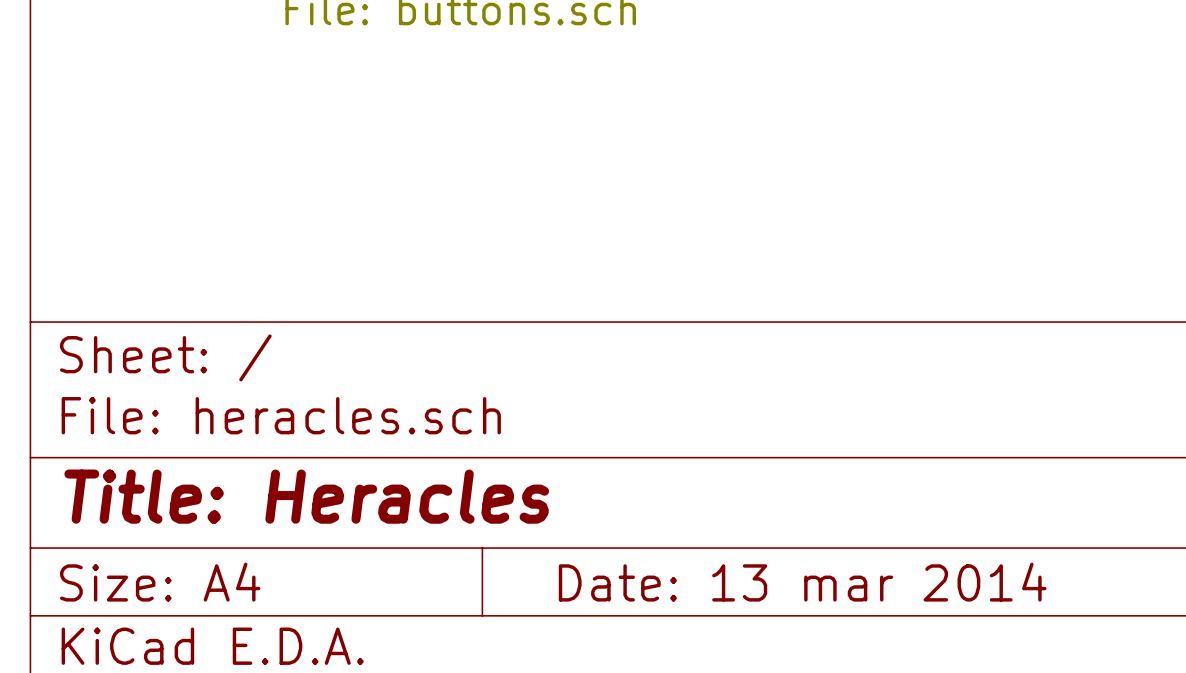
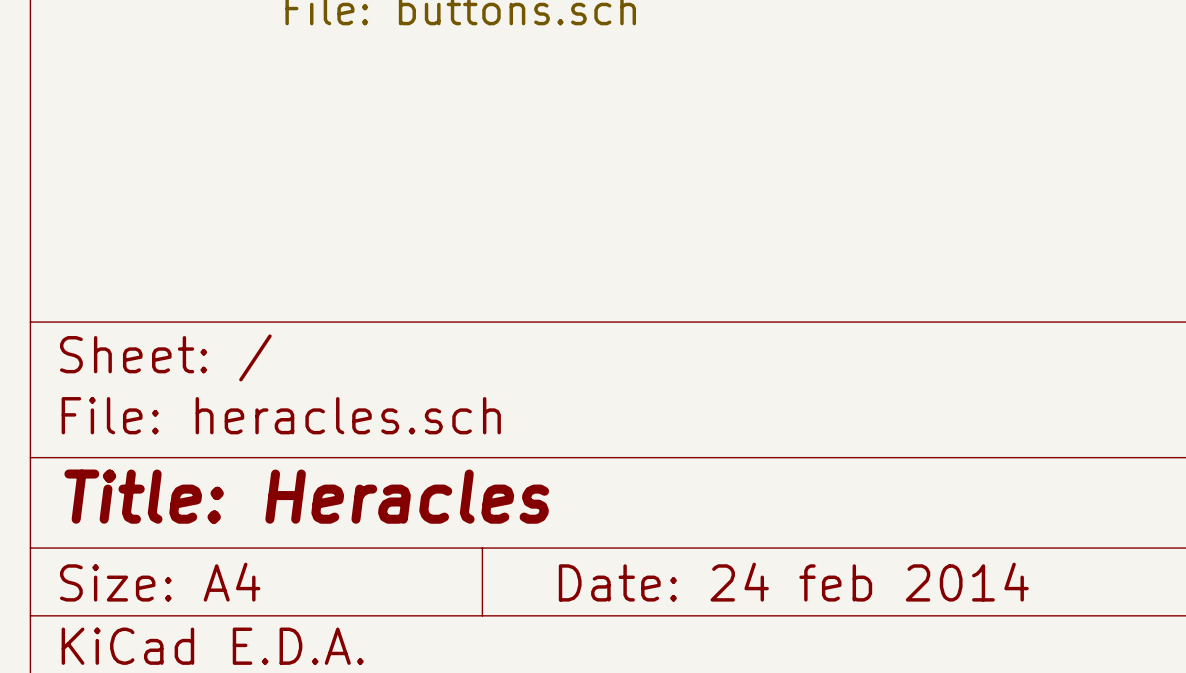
title block: Date: 13 mar 2014 (802, 582) -> Date: 24 feb 2014 (793, 582)

